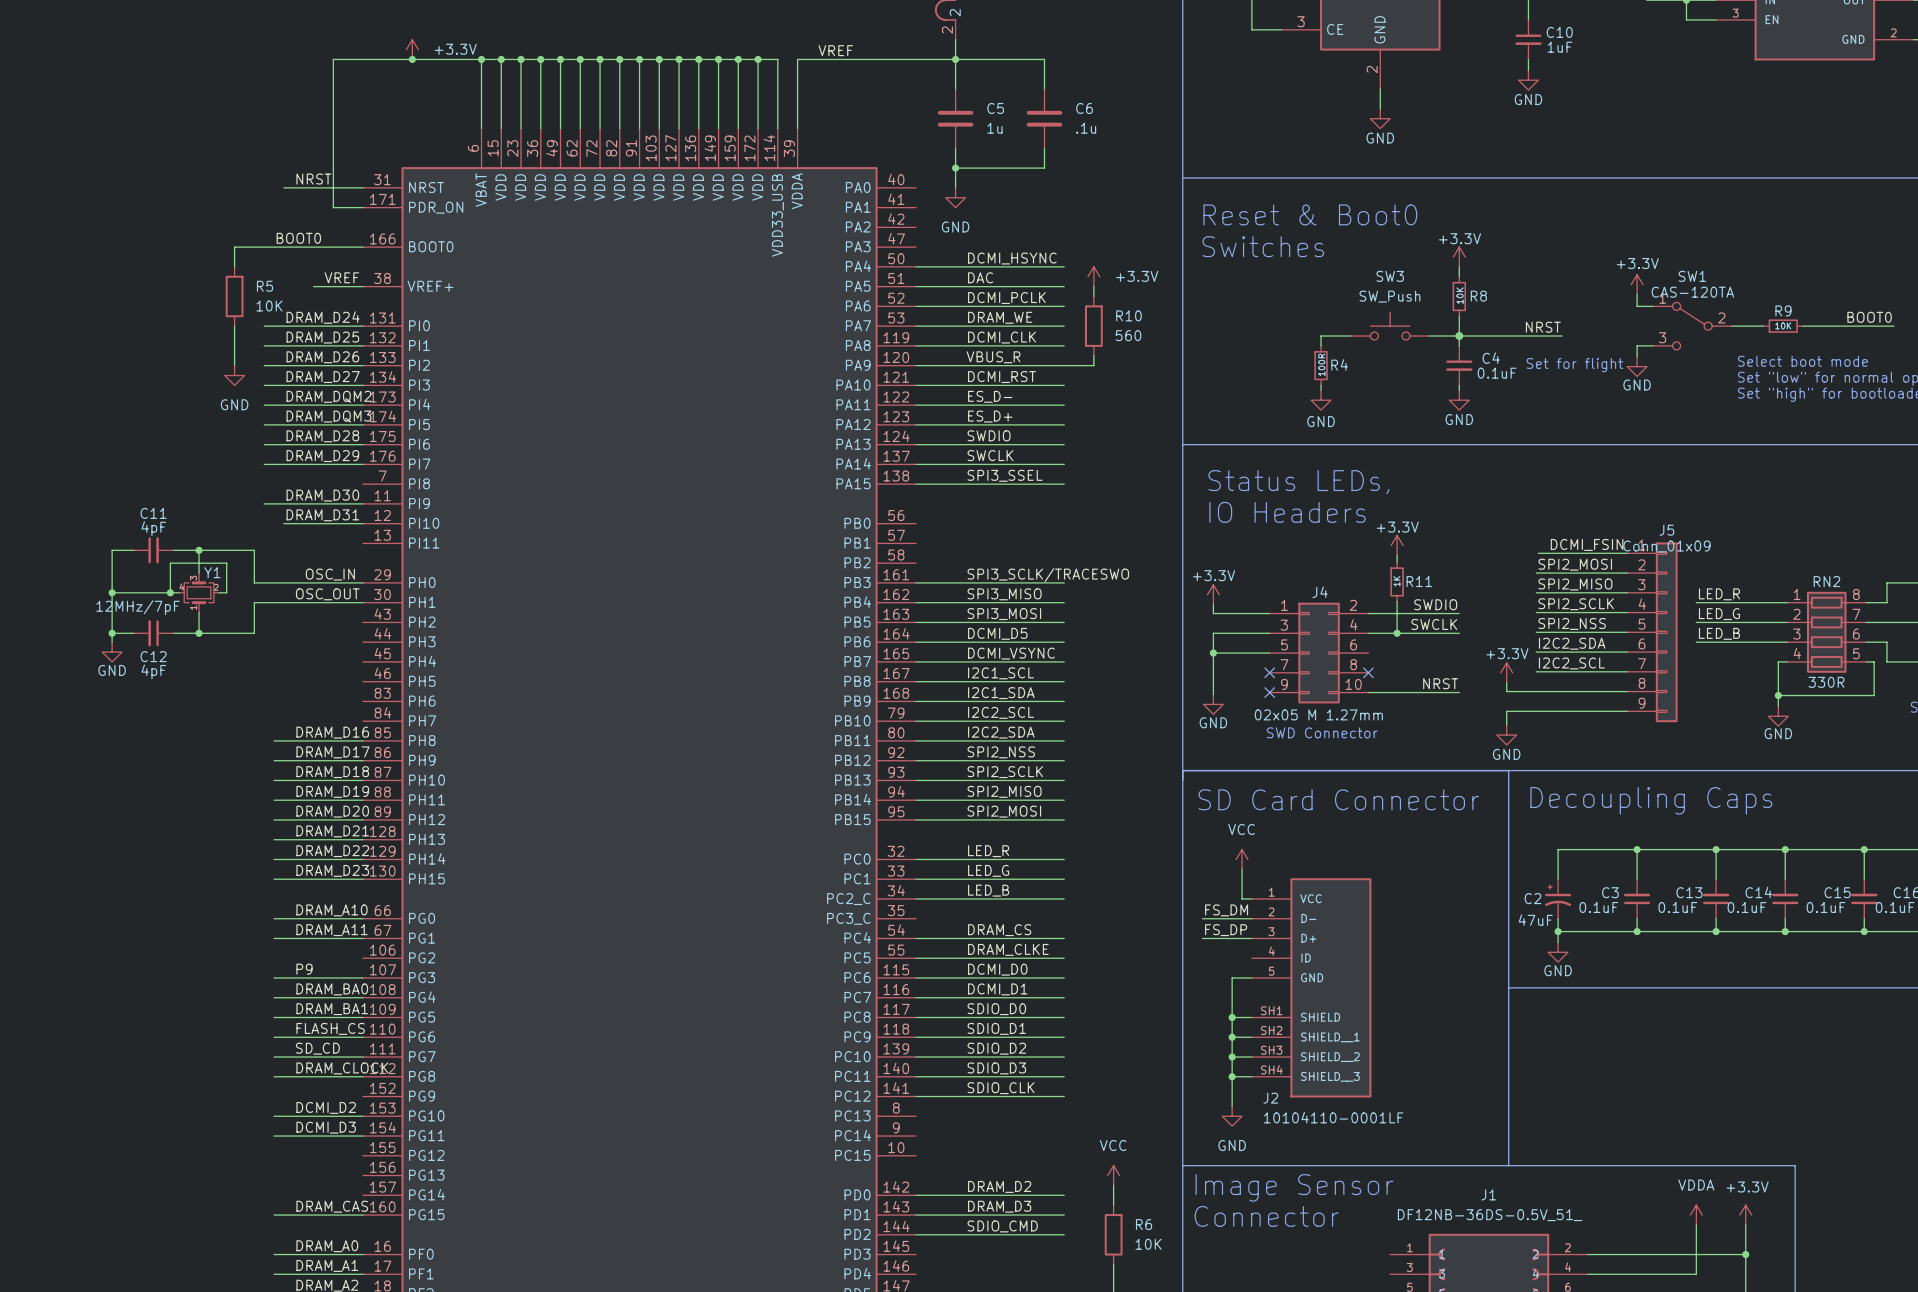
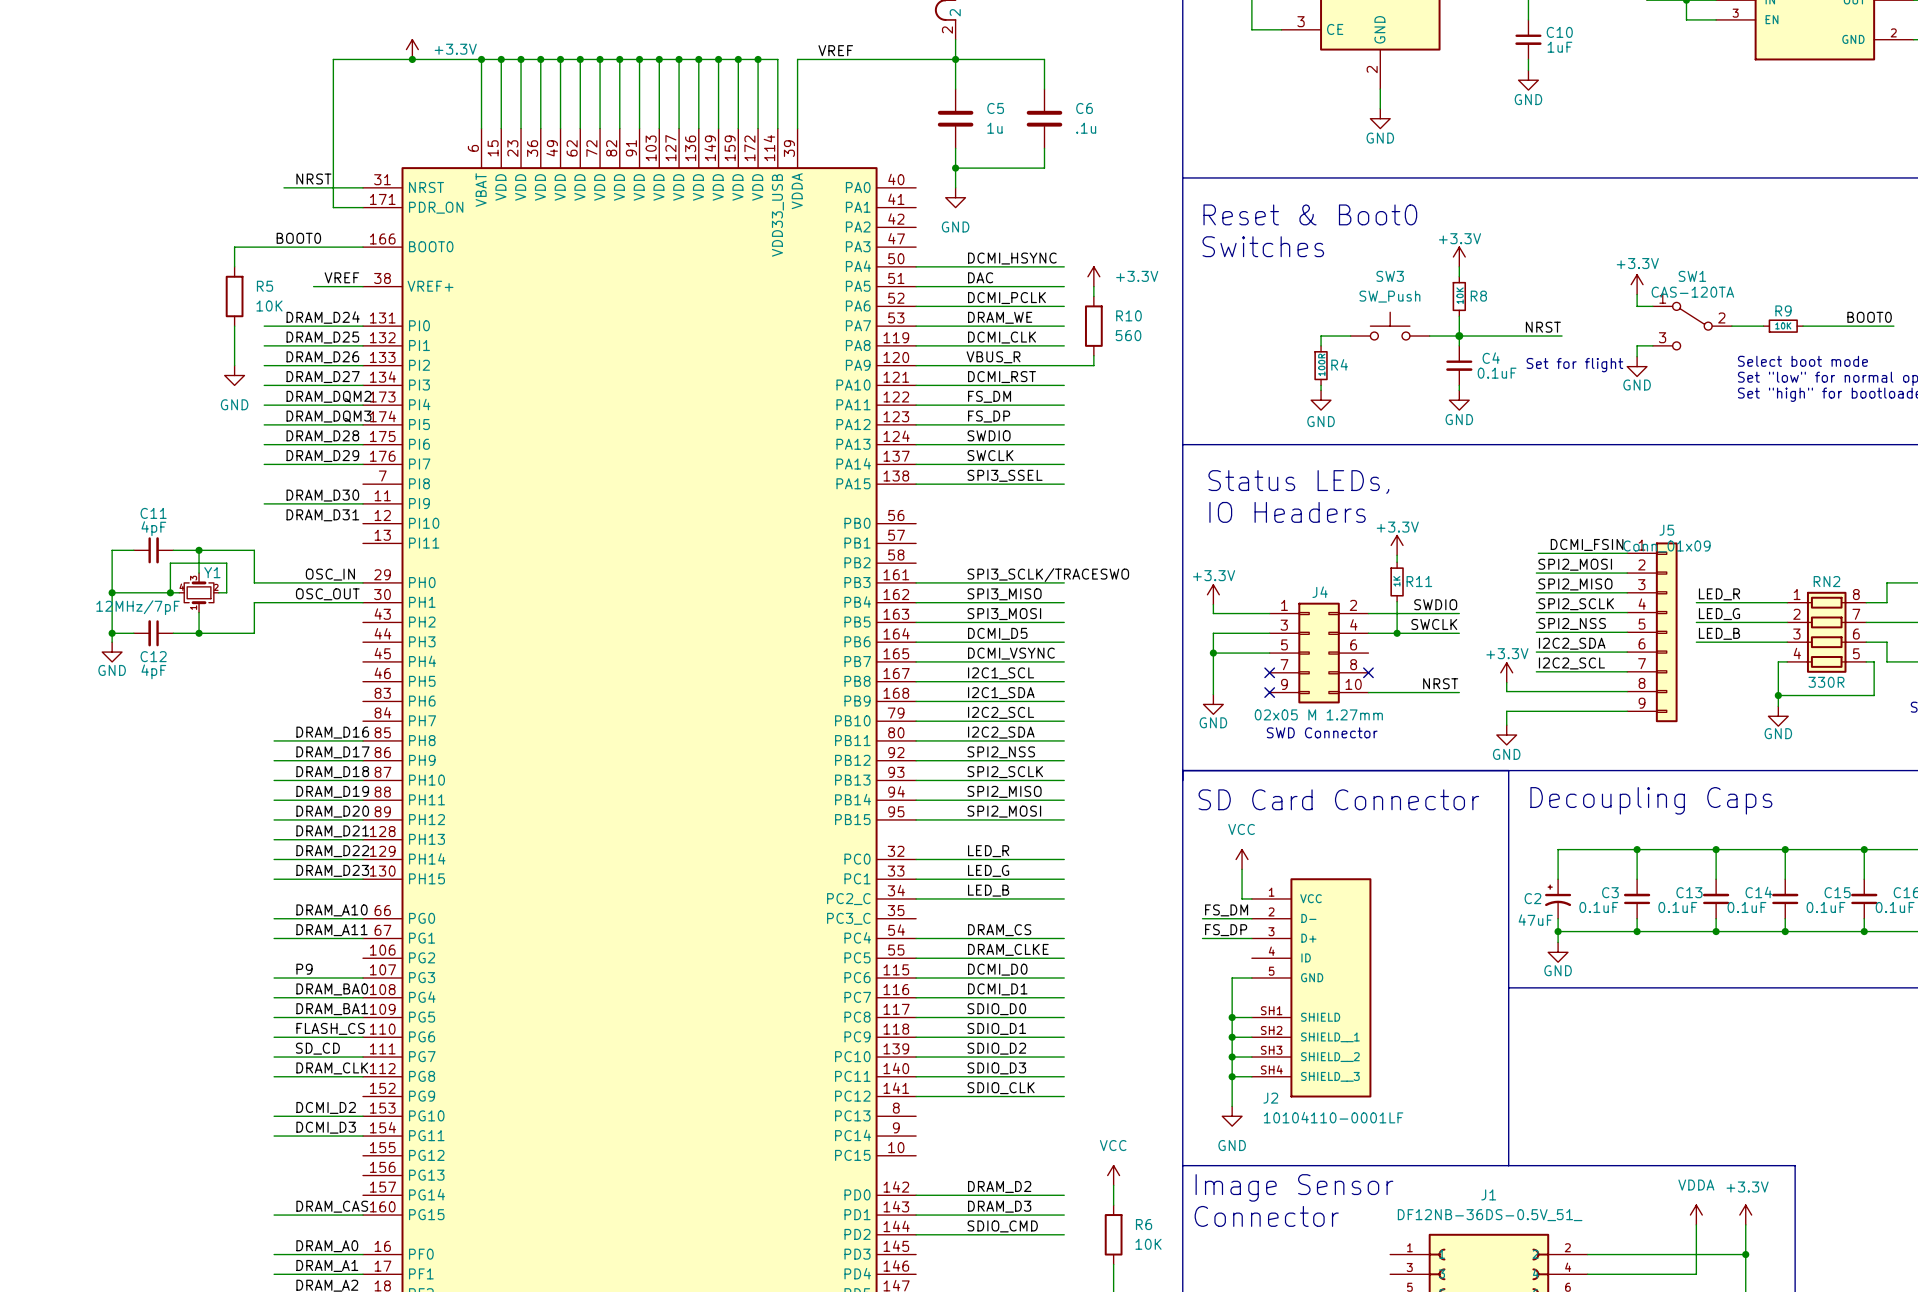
label: ES_D- (990, 396) -> FS_DM (989, 396)
label: ES_D+ (990, 416) -> FS_DP (989, 416)
wire: (283, 523) (362, 523) -> none
label: DRAM_CLOCK (342, 1068) -> DRAM_CLK (332, 1068)

